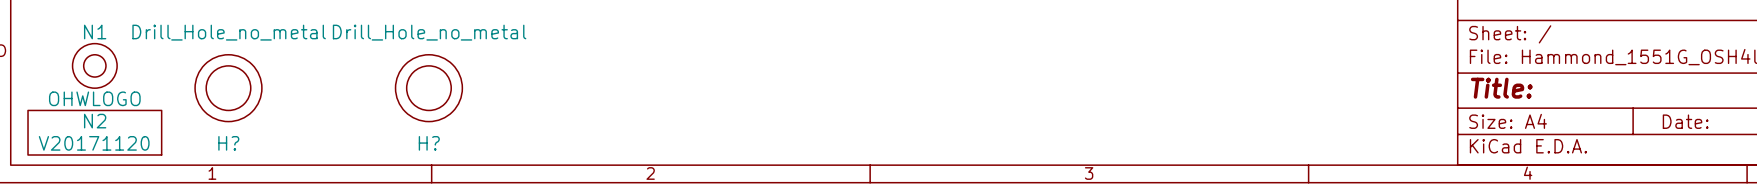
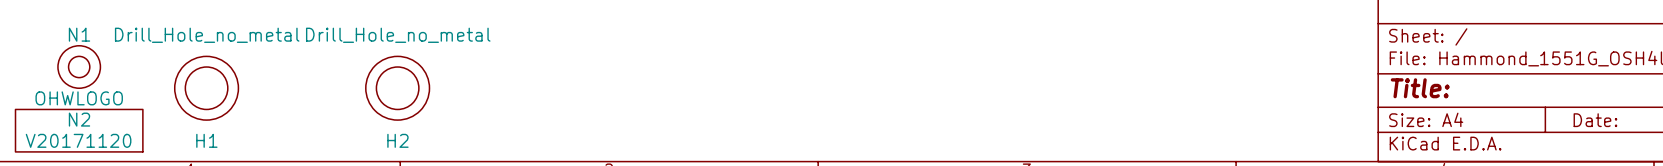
H? name: H? (228, 143) -> H1 (206, 140)
H? name: H? (429, 143) -> H2 (397, 140)

